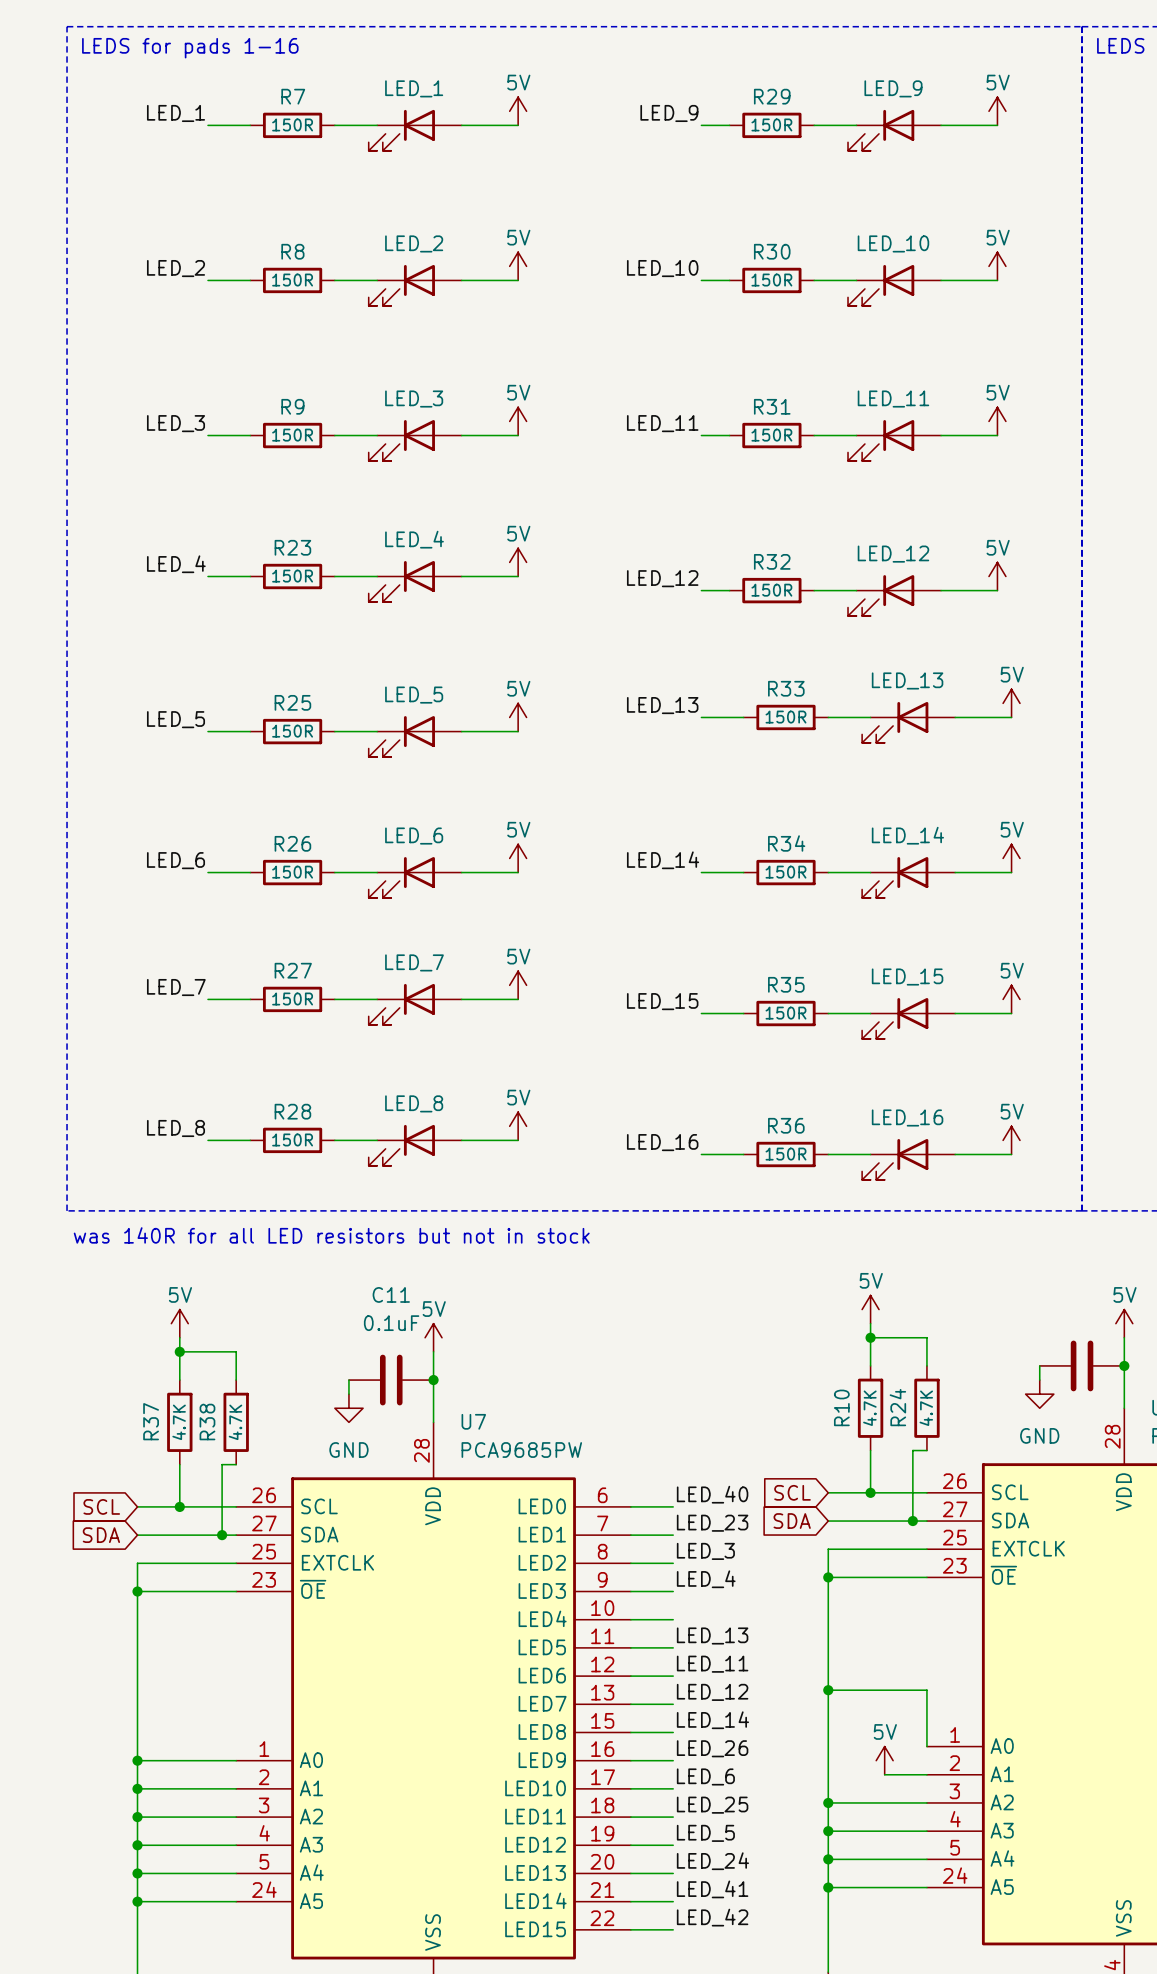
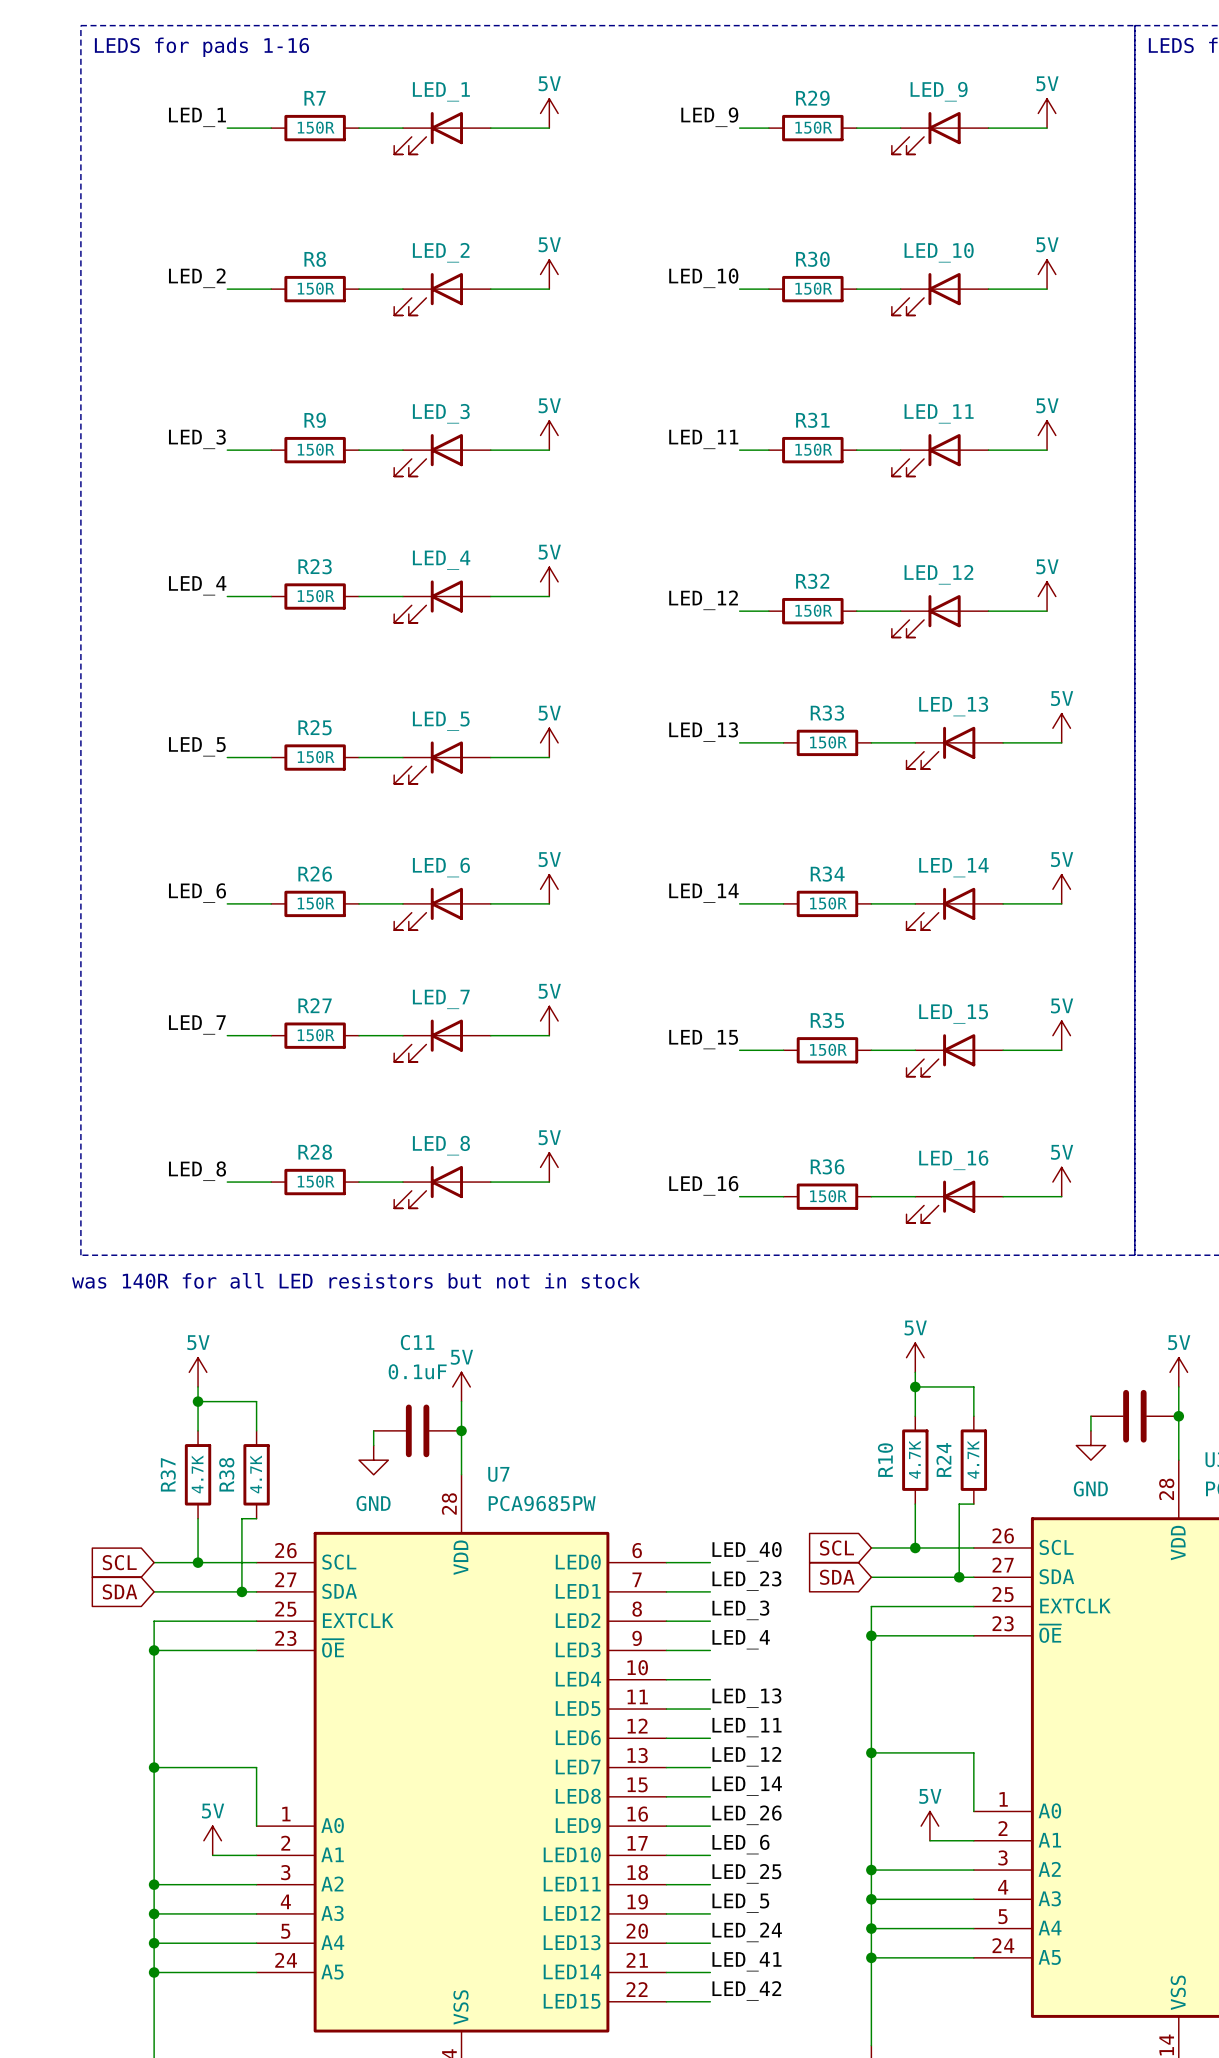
junction: none -> (154, 1767)
wire: (137, 1760) (236, 1760) -> (154, 1767) (256, 1767) (256, 1826)
junction: (137, 1760) -> none
power symbol: none -> 5V (212, 1840)
wire: (137, 1788) (193, 1788) -> none
junction: (137, 1788) -> none

